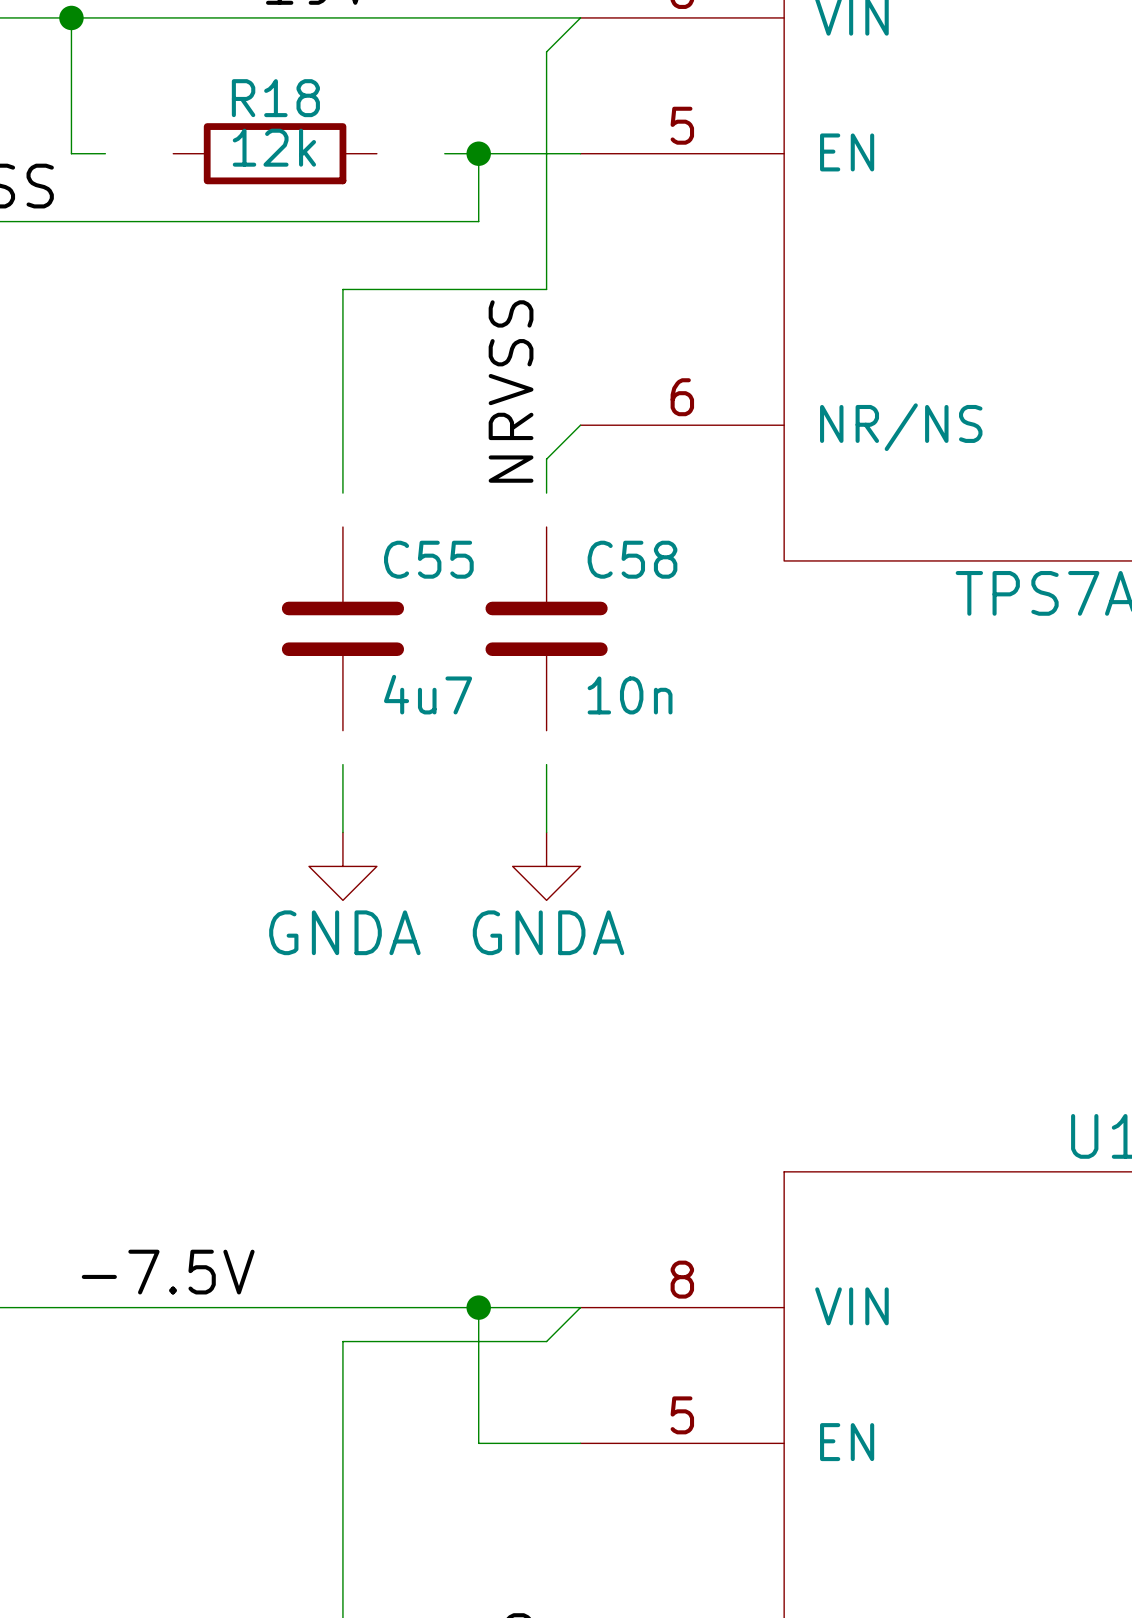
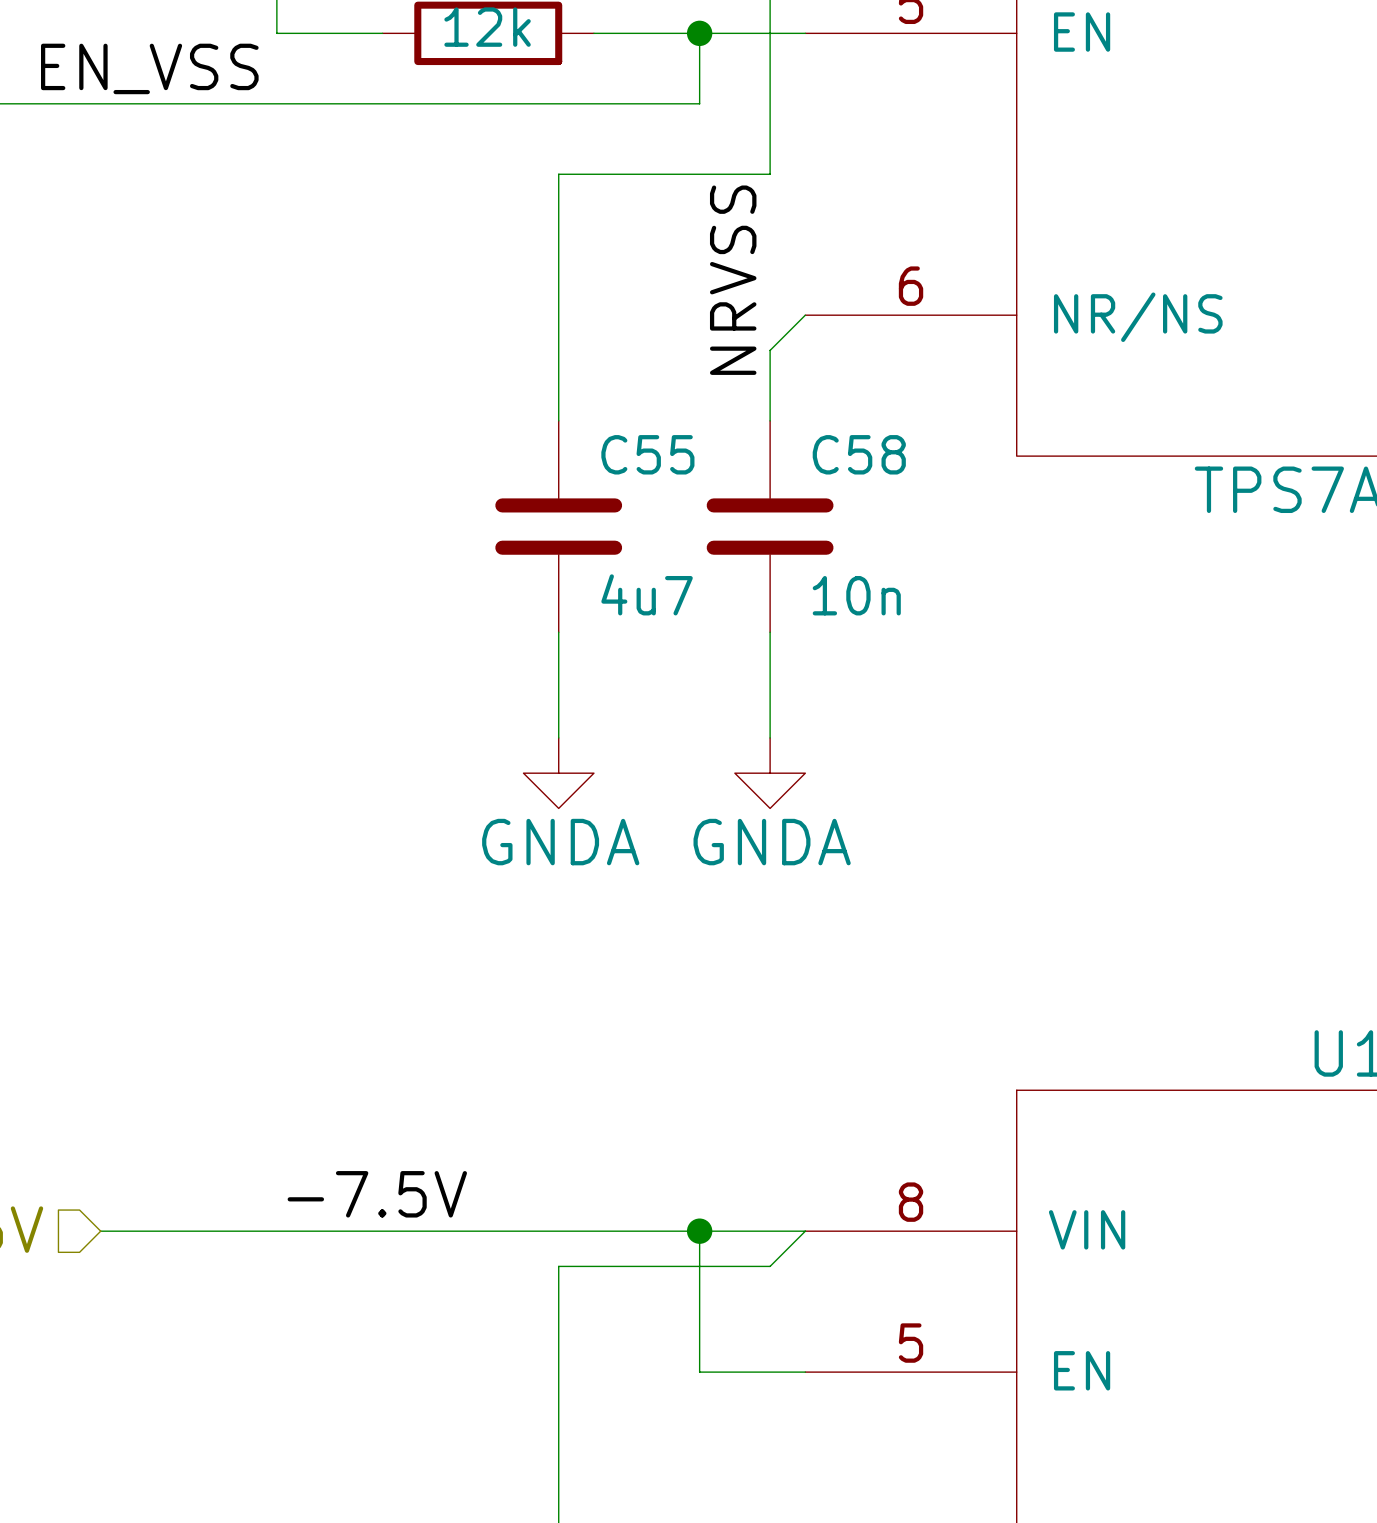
wire: none -> (312, 33) (382, 33)
wire: none -> (593, 33) (664, 33)
wire: none -> (558, 385) (558, 420)
wire: none -> (770, 385) (770, 420)
wire: none -> (558, 632) (558, 667)
wire: none -> (770, 632) (770, 667)

